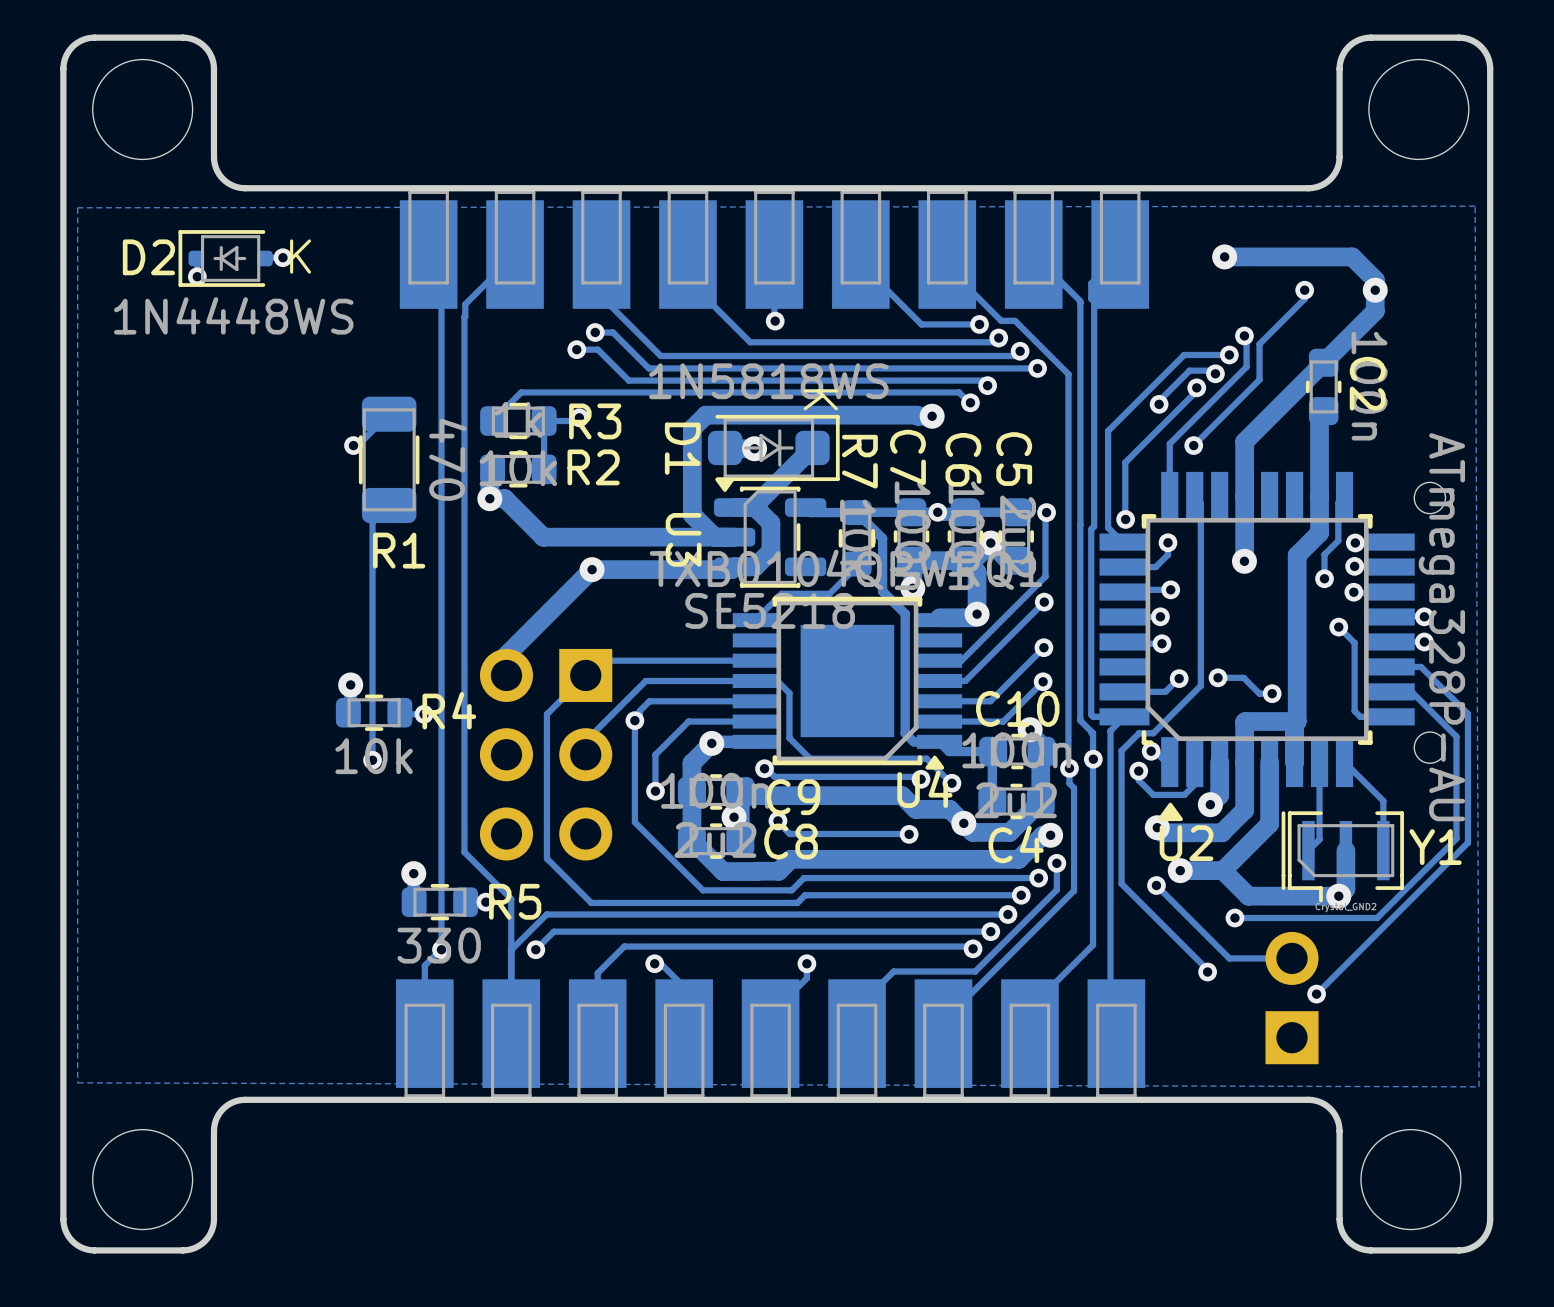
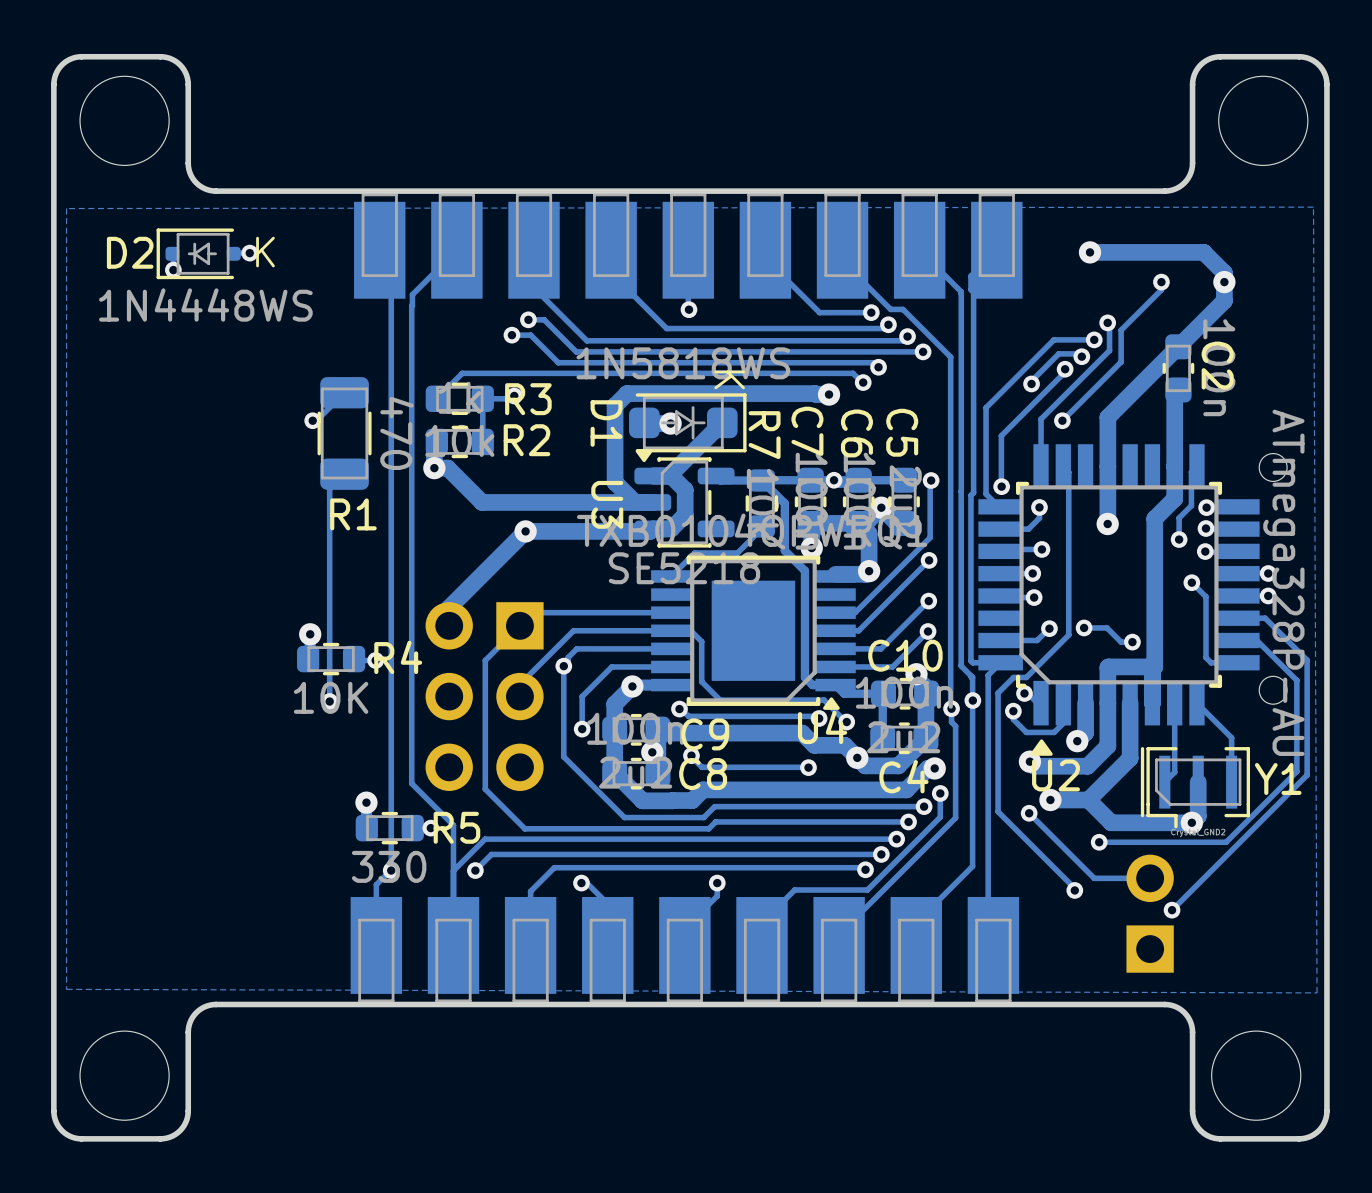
R4 value: 10k (374, 756) -> 10K (331, 697)

